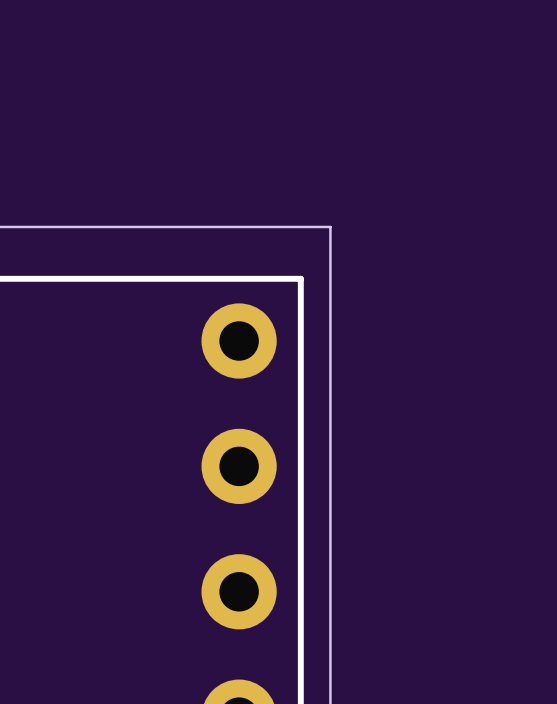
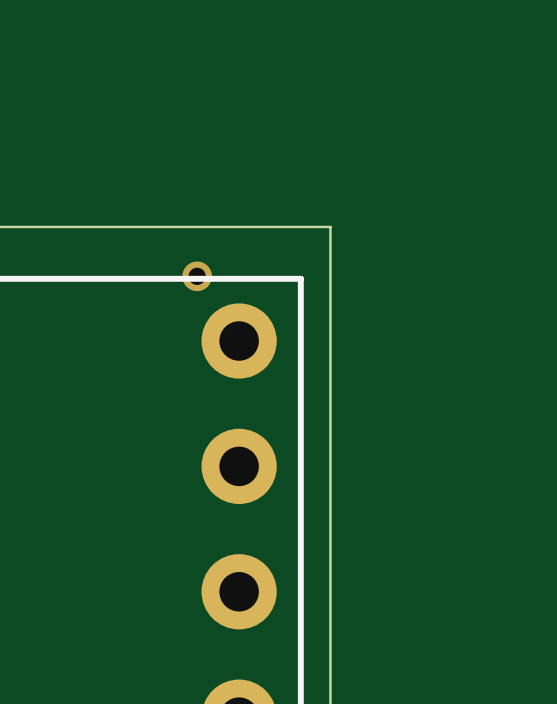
via: none -> (197, 276)

